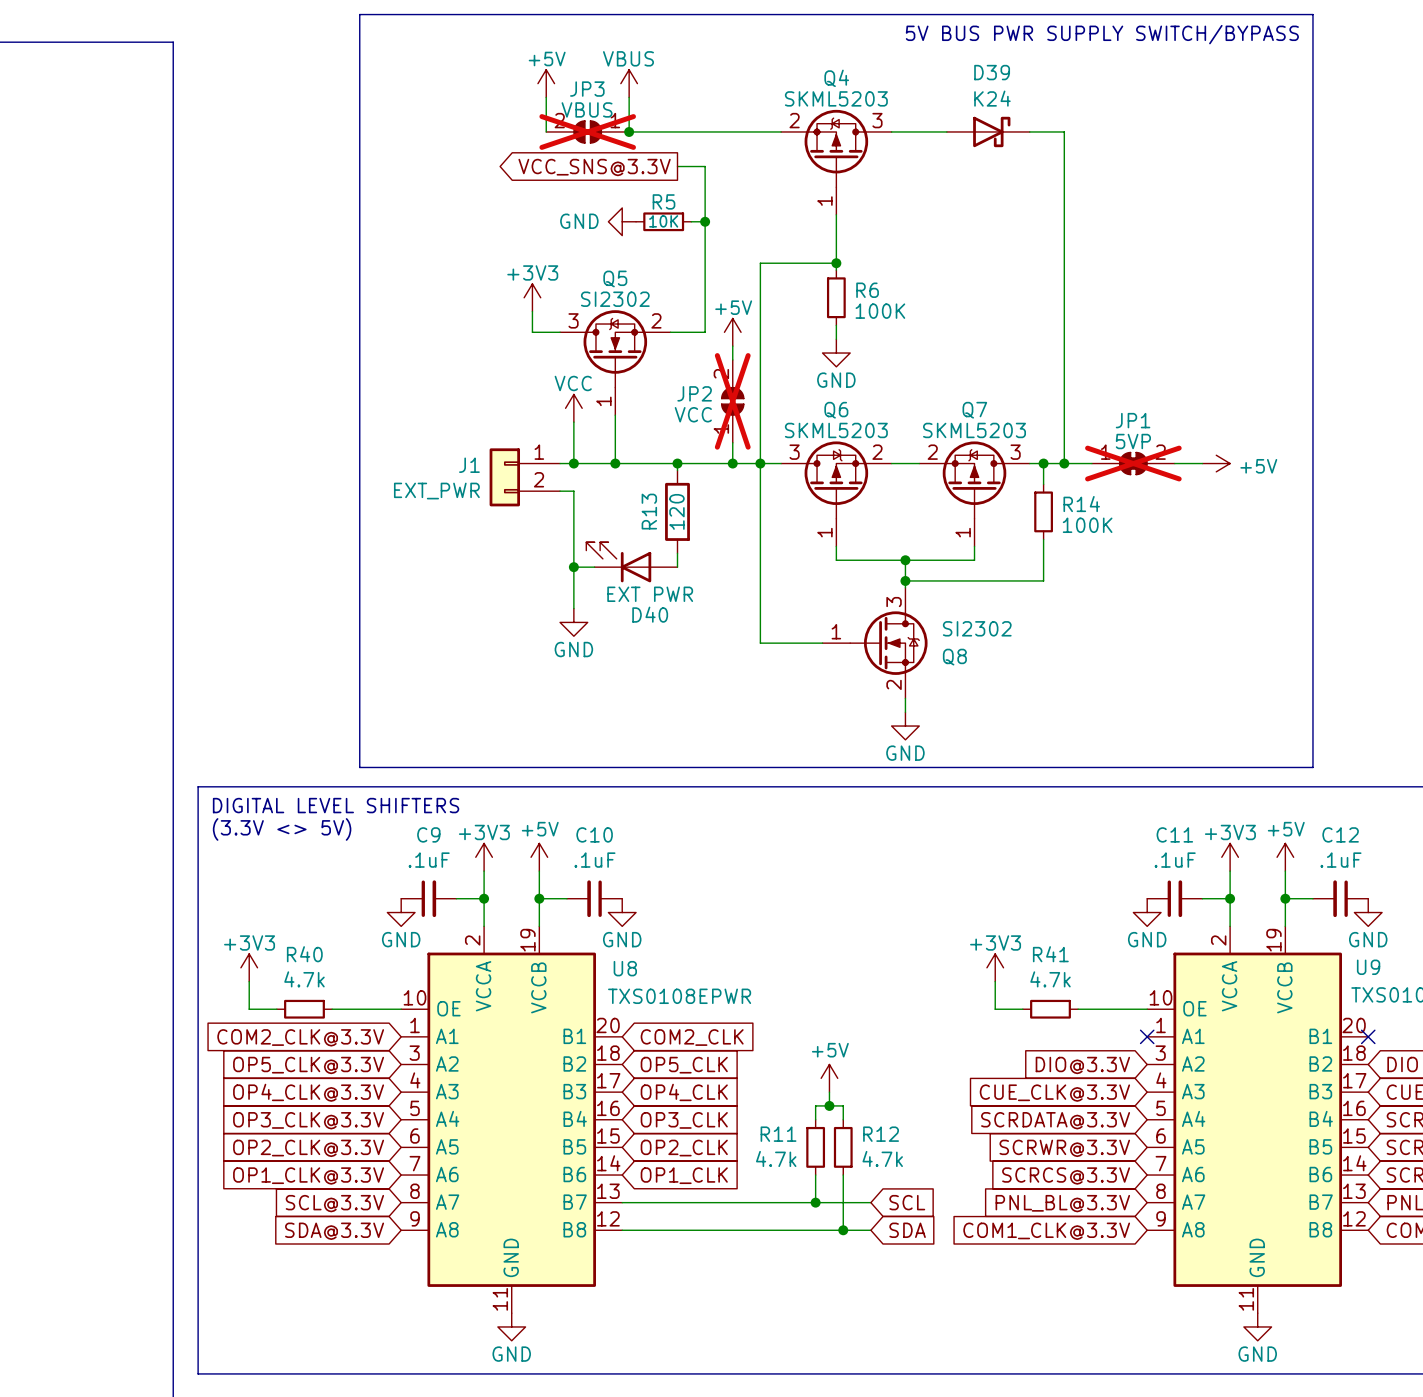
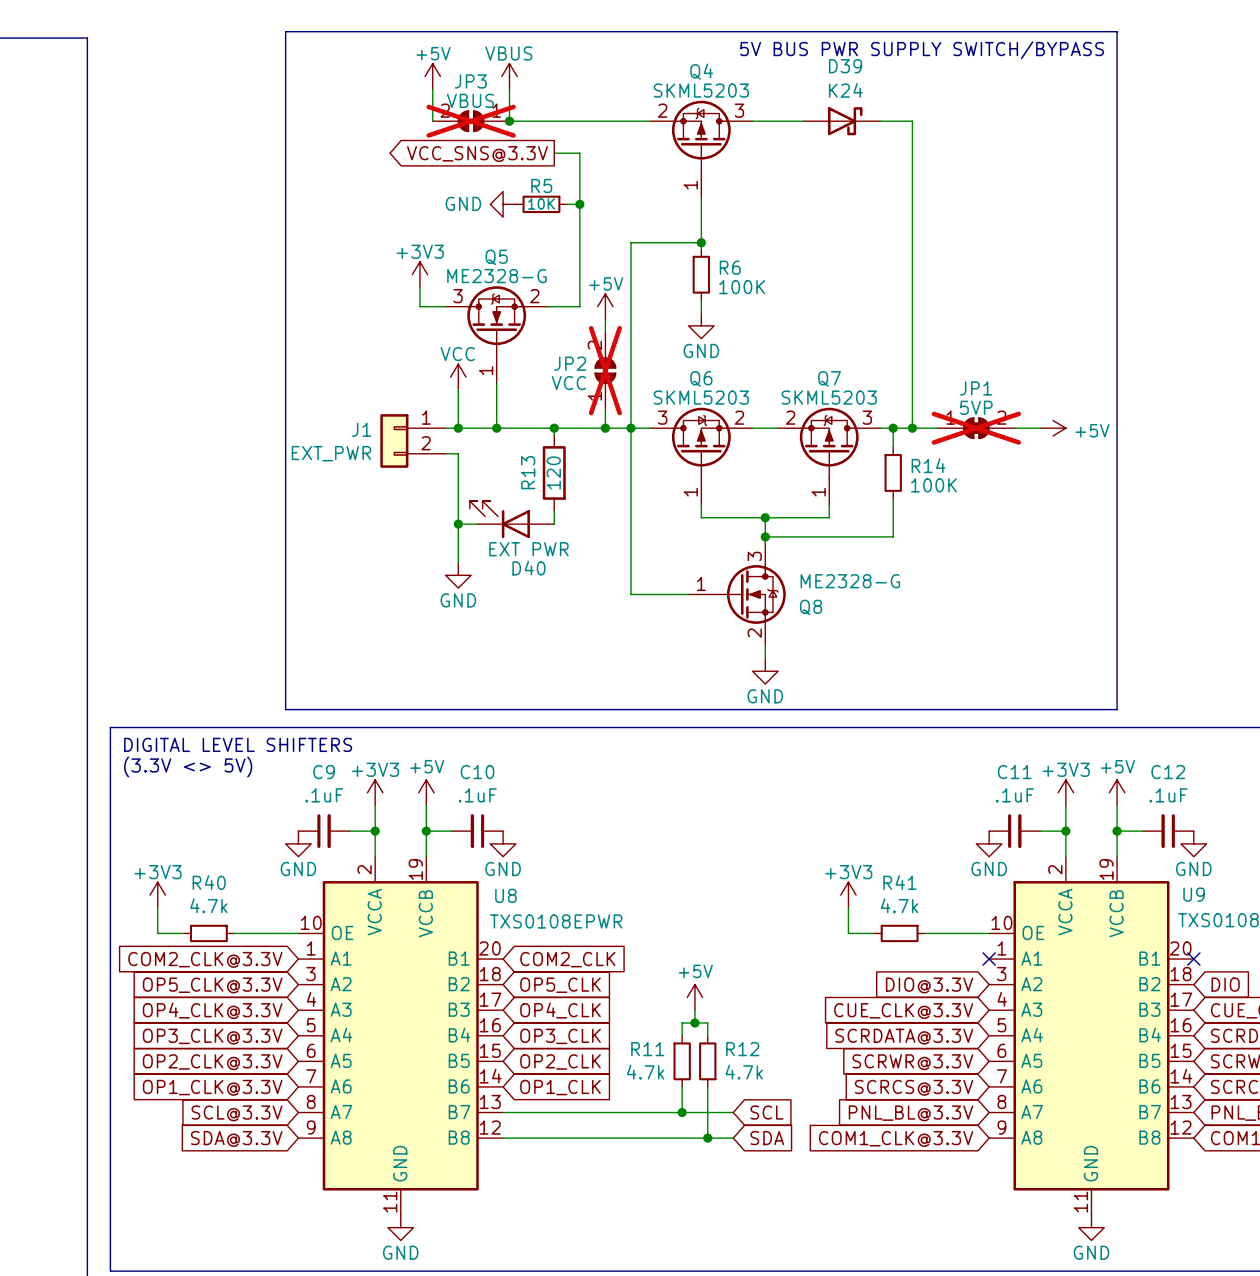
text position: 5V BUS PWR SUPPLY SWITCH/BYPASS (1102, 34) -> 5V BUS PWR SUPPLY SWITCH/BYPASS (922, 50)
Q5 value: SI2302 (615, 299) -> ME2328-G (496, 276)
Q8 value: SI2302 (977, 628) -> ME2328-G (850, 581)
line: (387, 767) (359, 767) (359, 14) (1312, 14) (1312, 767) (1285, 767) -> (285, 709) (285, 31) (1117, 31) (1117, 709)

